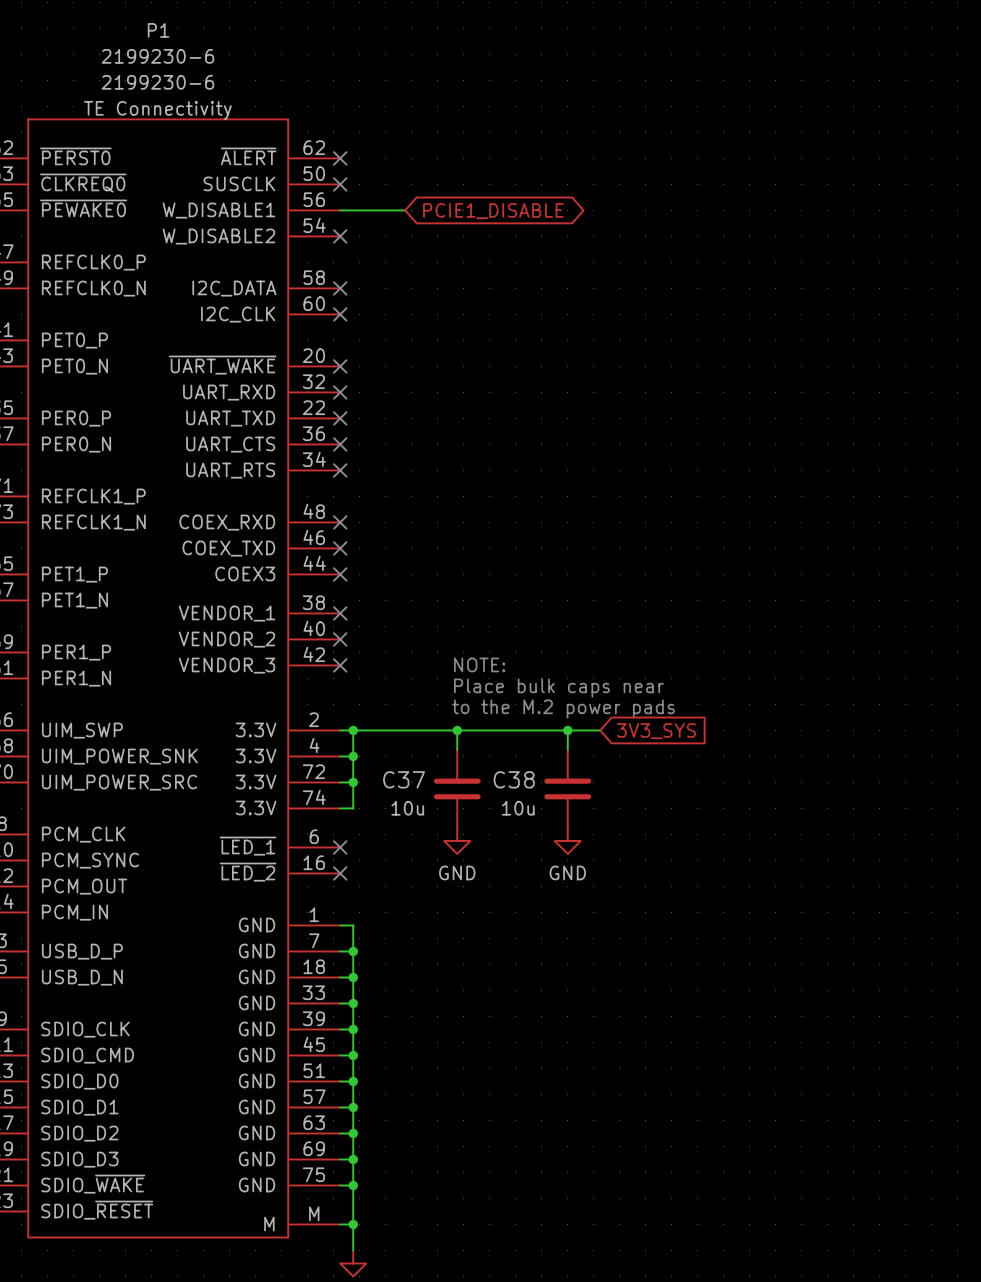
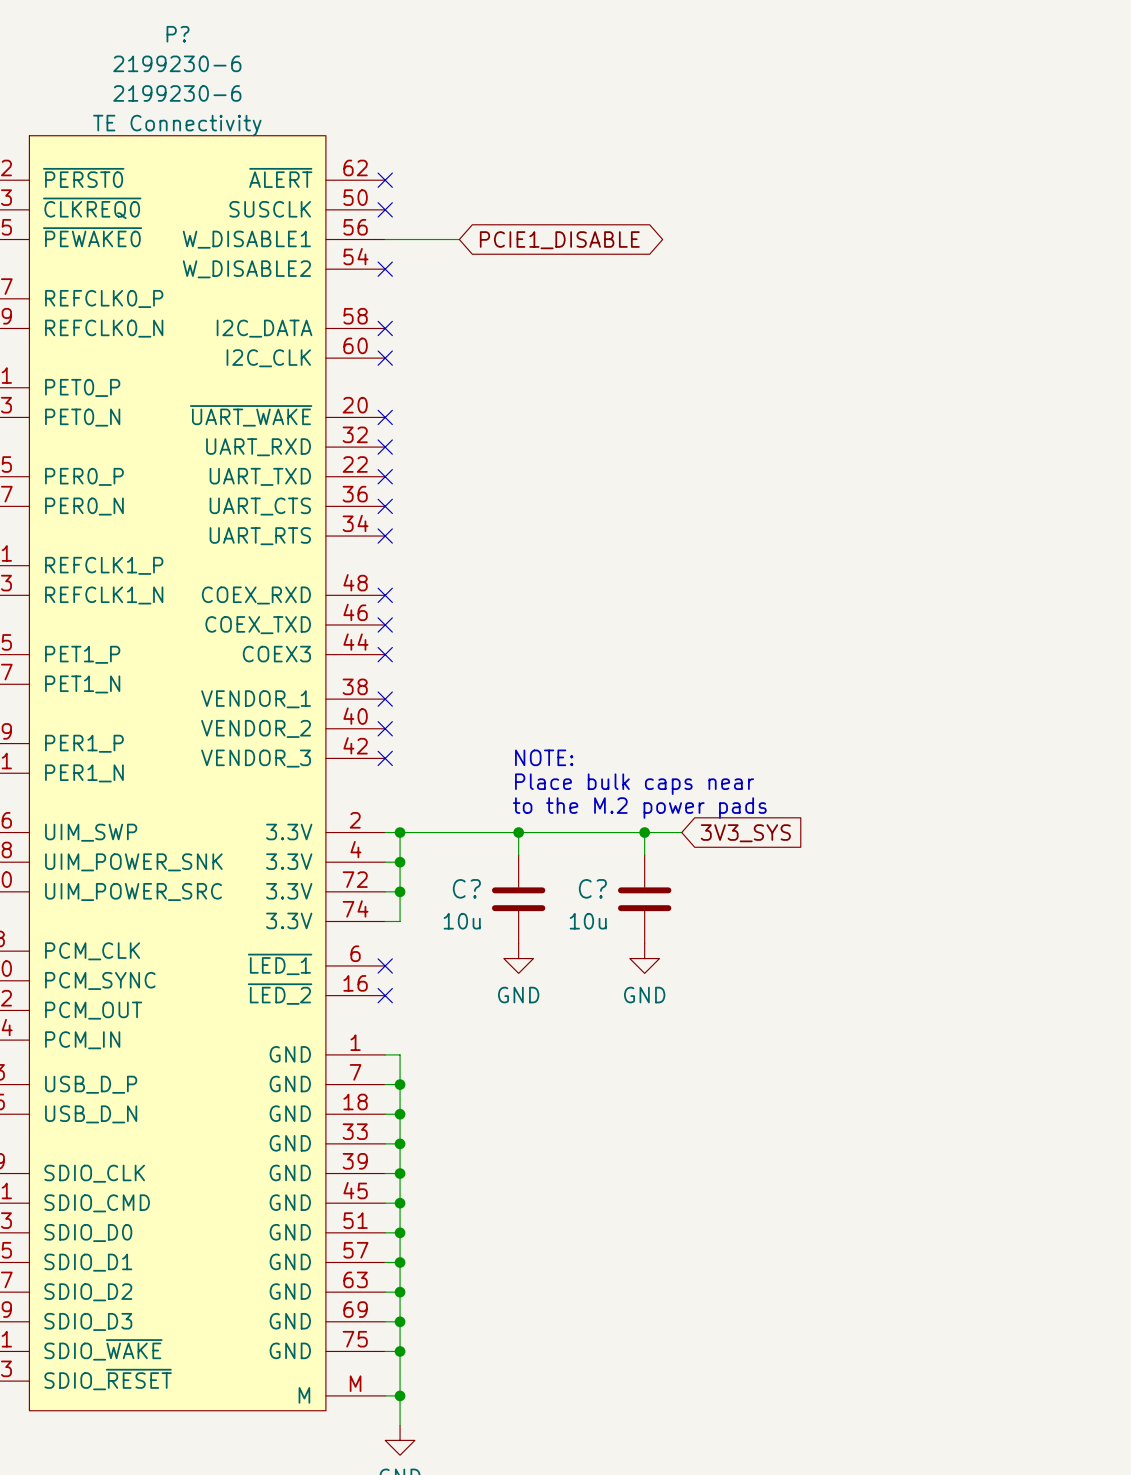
P1 name: P1 (158, 30) -> P? (178, 34)
C37 name: C37 (404, 779) -> C? (466, 888)
C38 name: C38 (514, 779) -> C? (592, 888)

